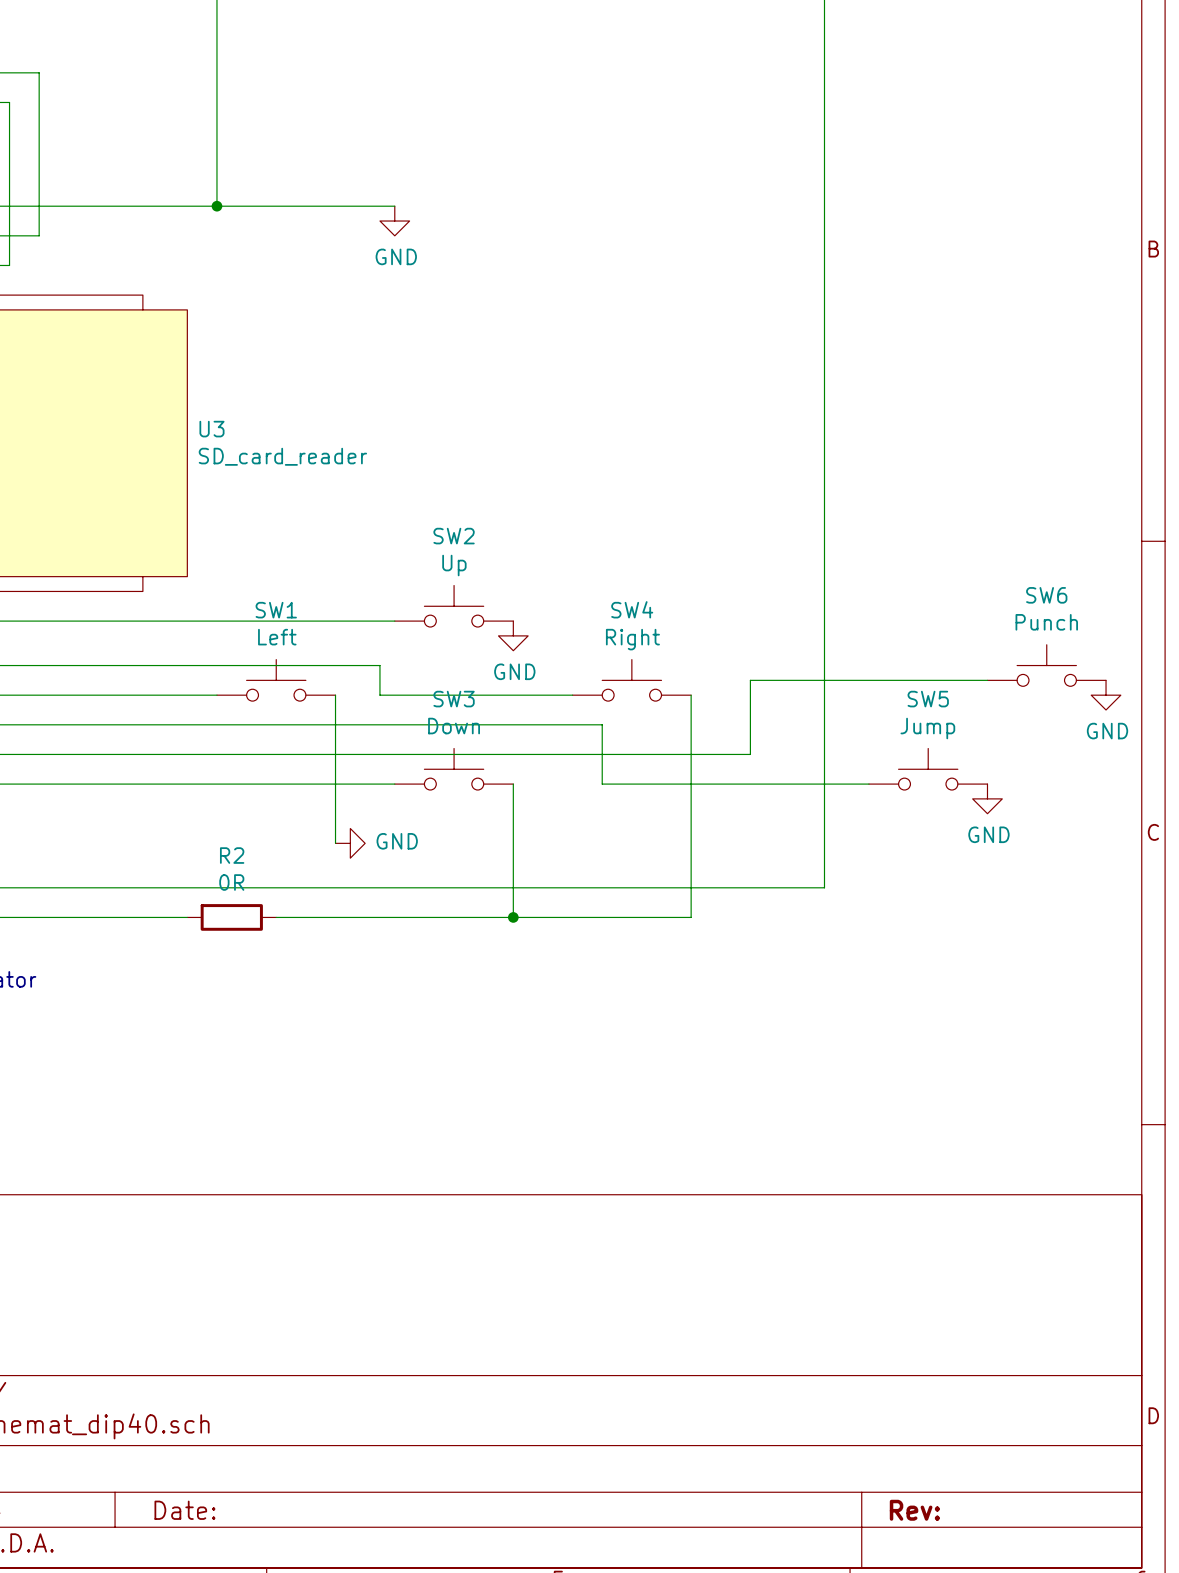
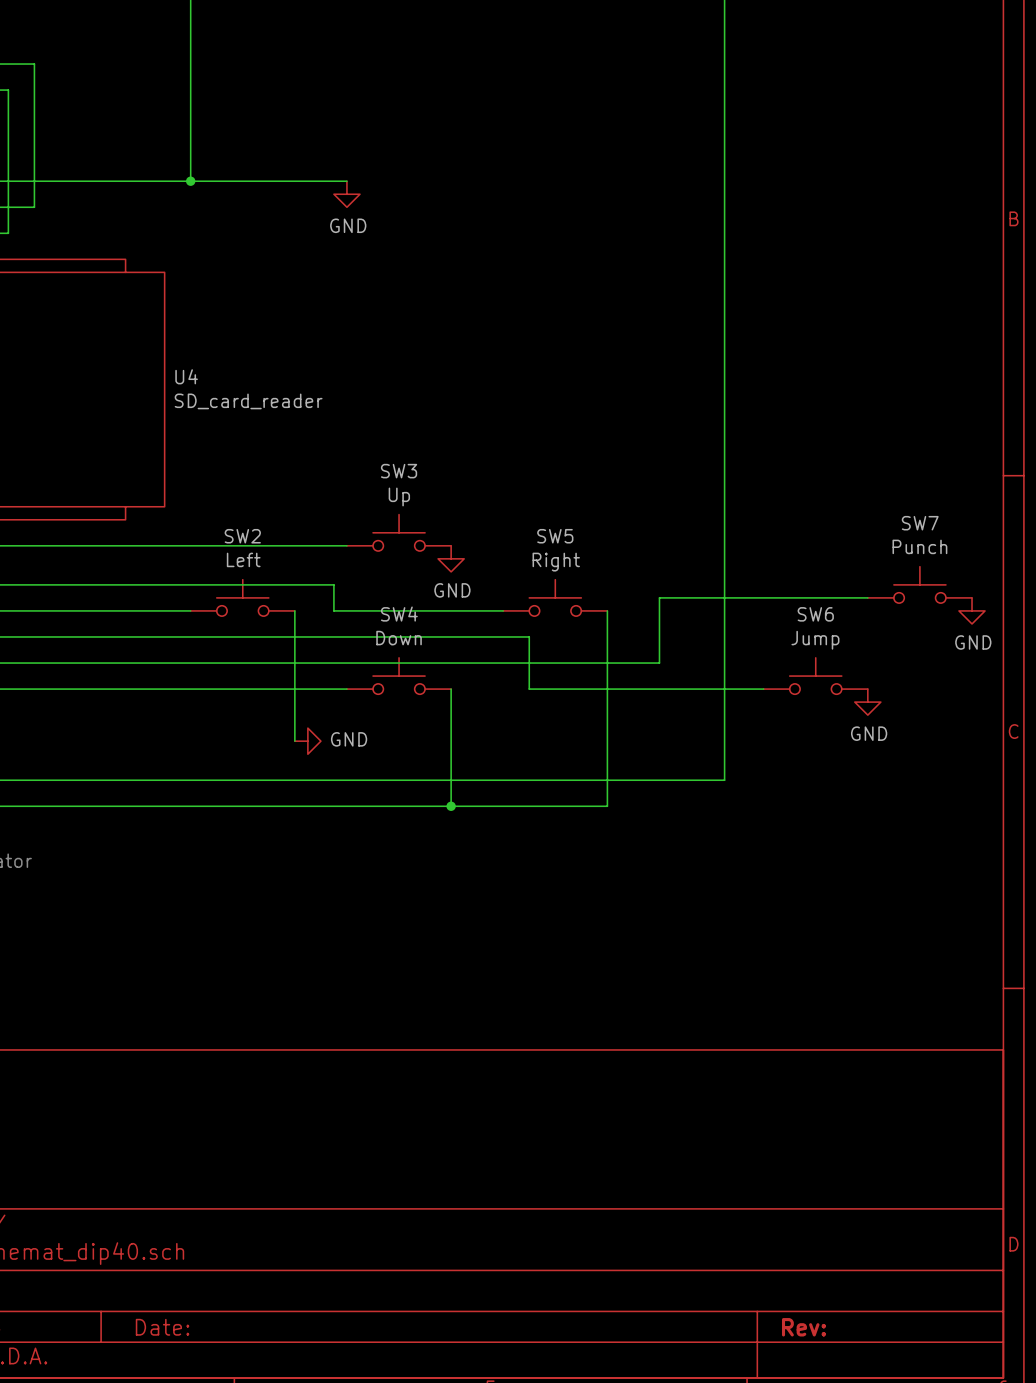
U3 name: U3 (211, 429) -> U4 (186, 376)
SW2 name: SW2 (454, 536) -> SW3 (399, 471)
SW6 name: SW6 (1046, 595) -> SW7 (920, 523)
SW4 name: SW4 (632, 609) -> SW5 (555, 536)
SW1 name: SW1 (276, 610) -> SW2 (242, 536)
SW3 name: SW3 (454, 699) -> SW4 (399, 614)
SW5 name: SW5 (928, 699) -> SW6 (815, 614)
wire: none -> (164, 806) (242, 806)
R2: 0R (231, 917) -> none

